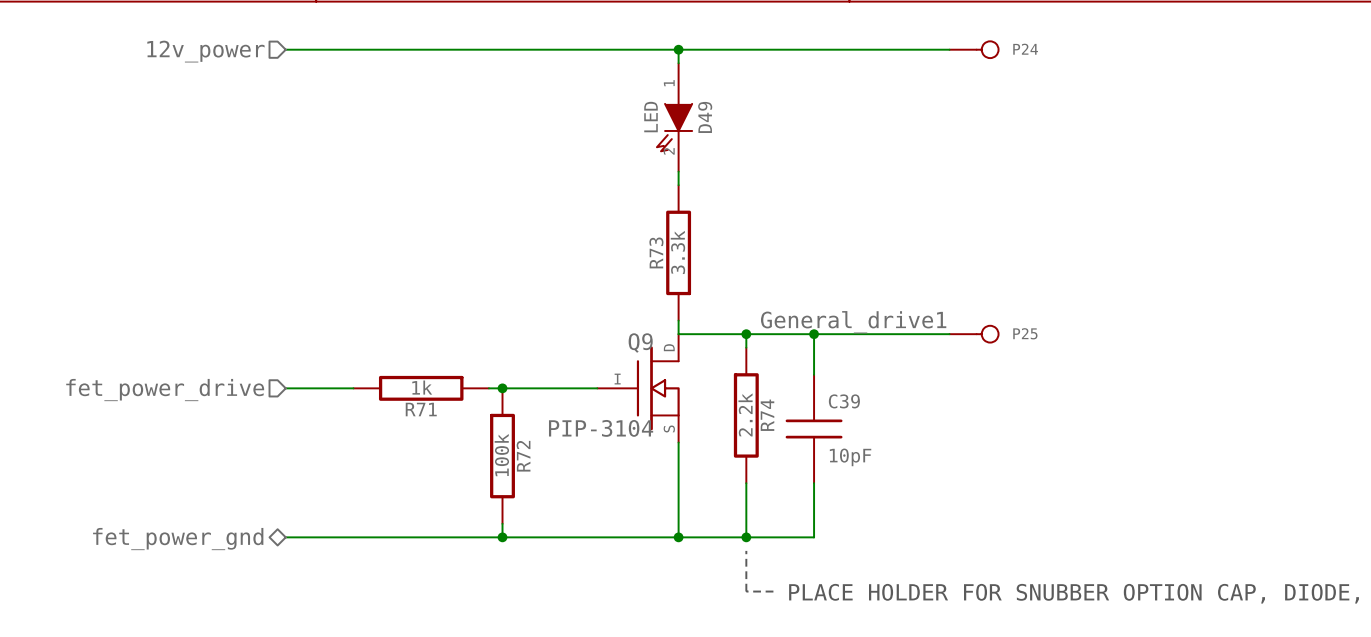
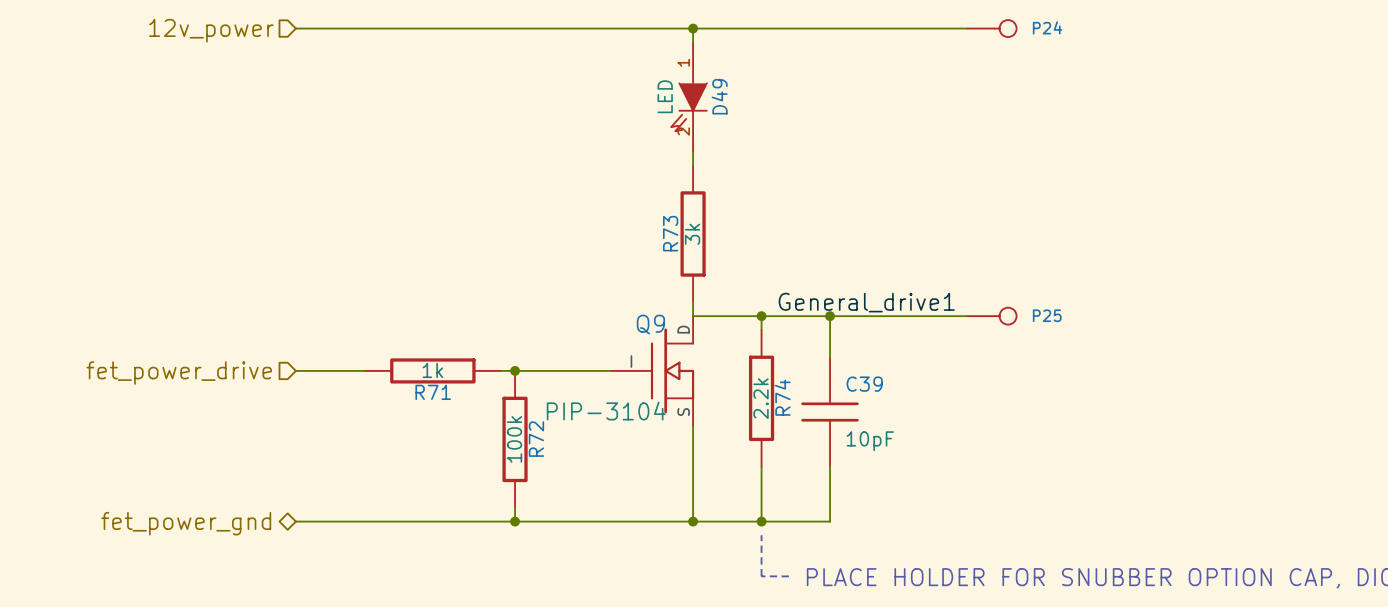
R73 value: 3.3k (677, 252) -> 3k (692, 234)

